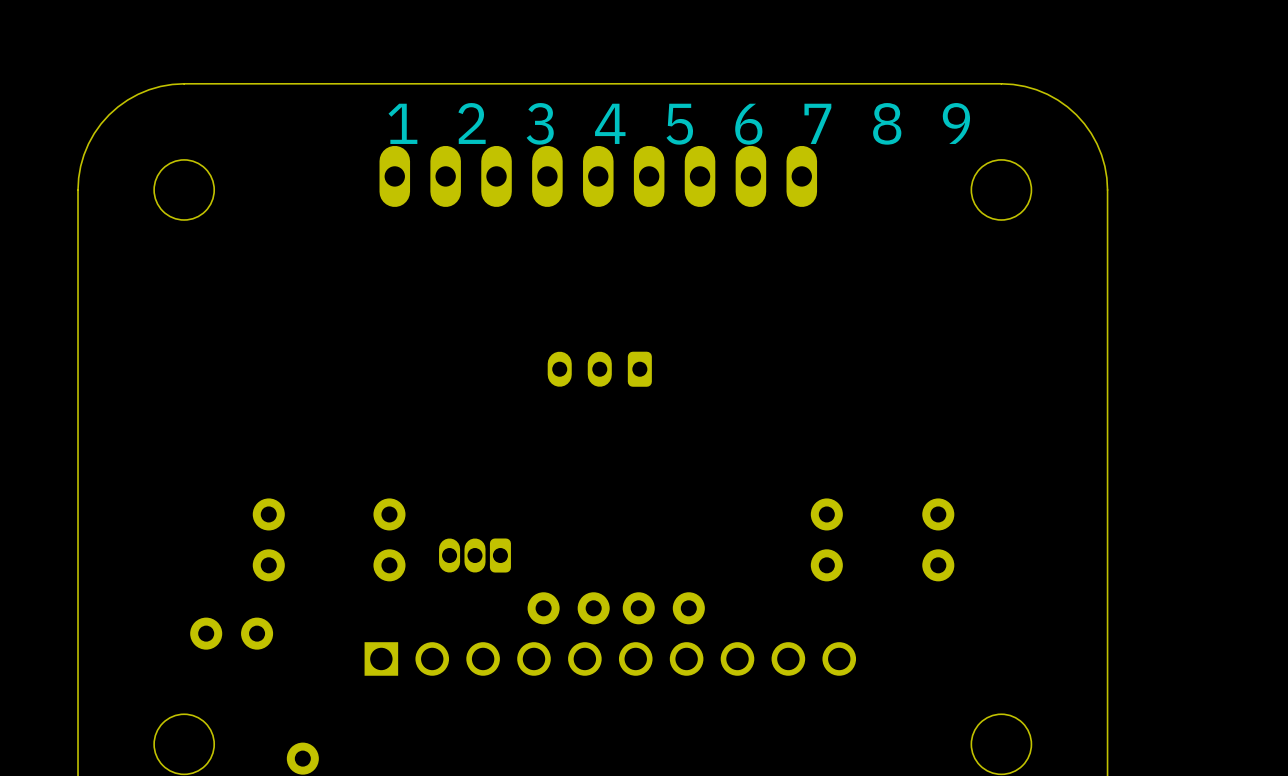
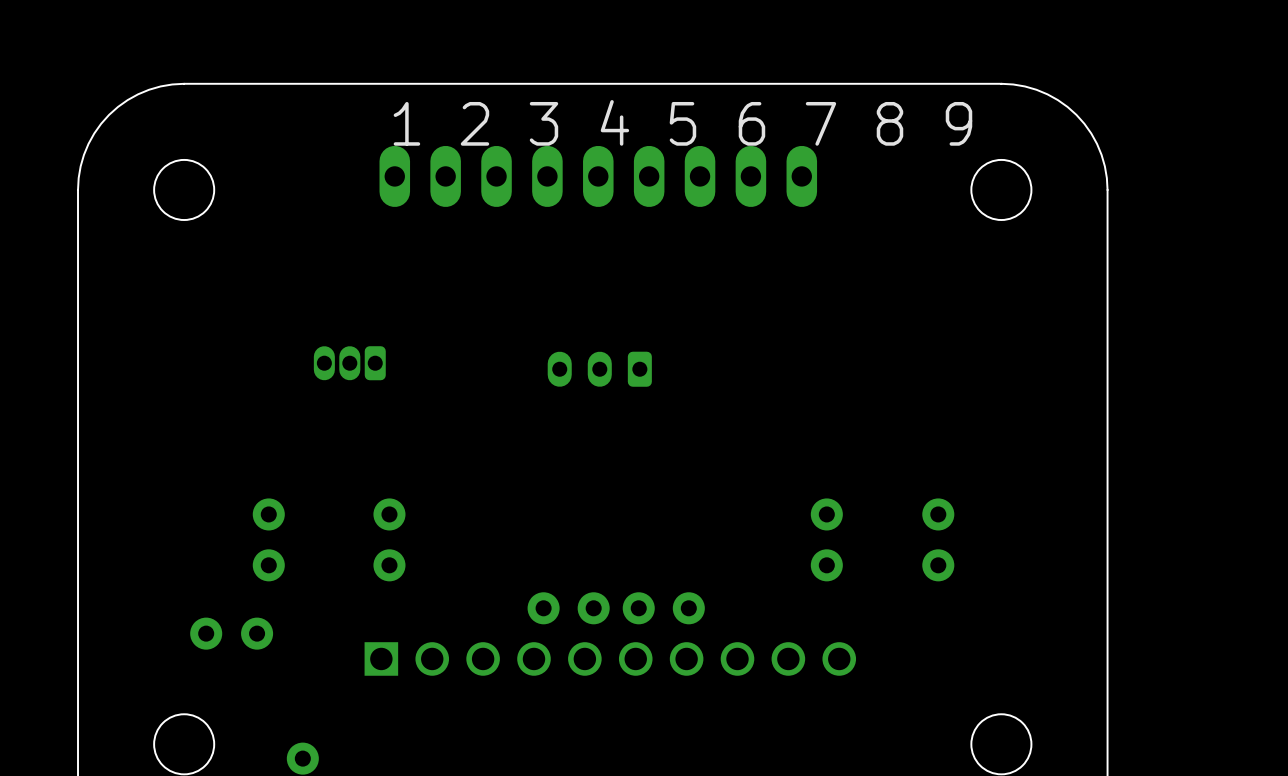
part position: (475, 555) -> (349, 363)

